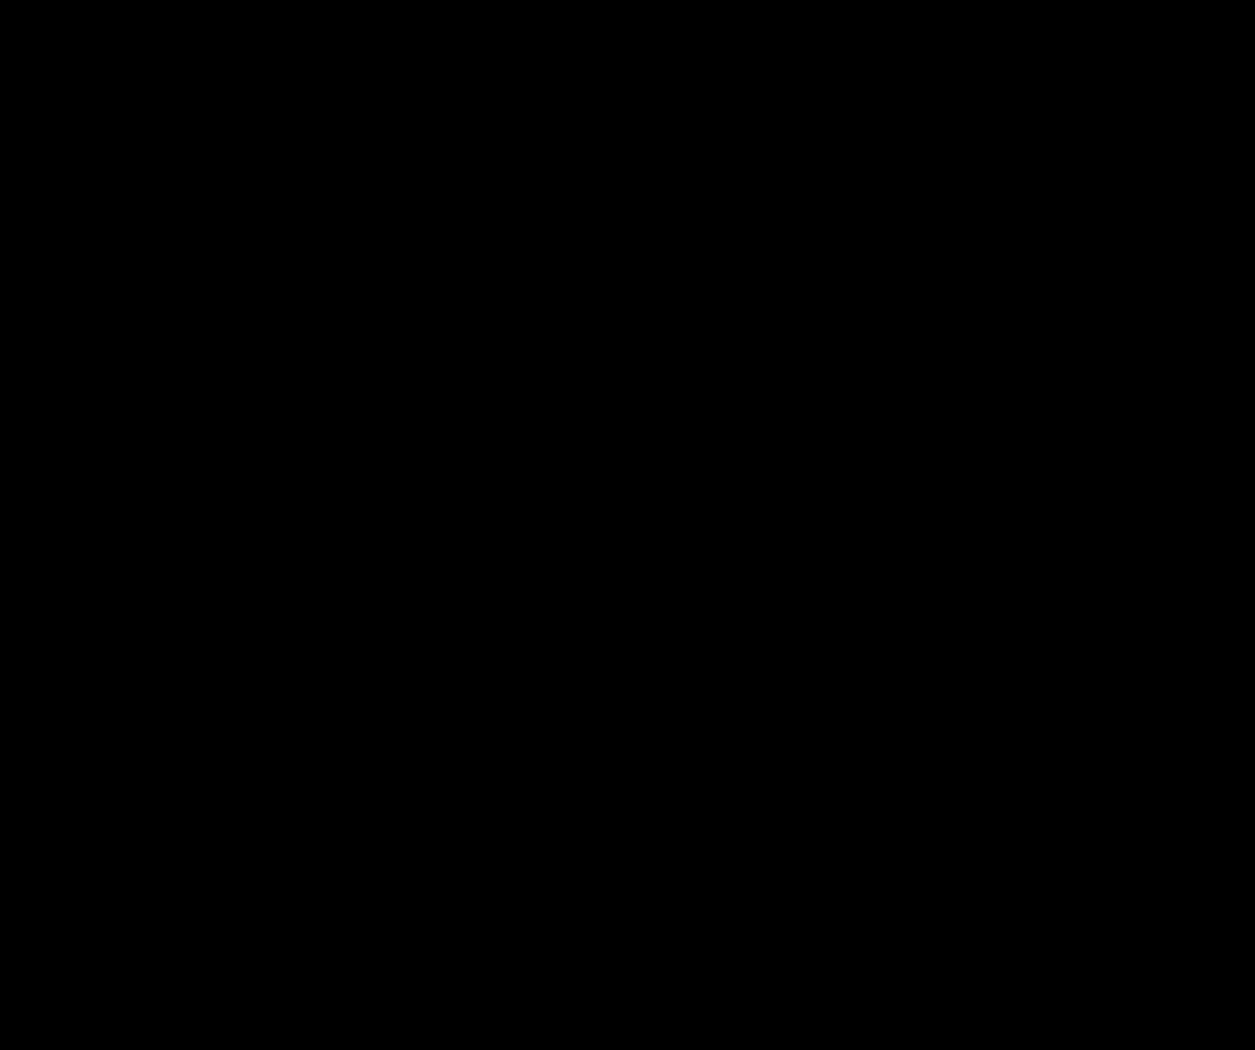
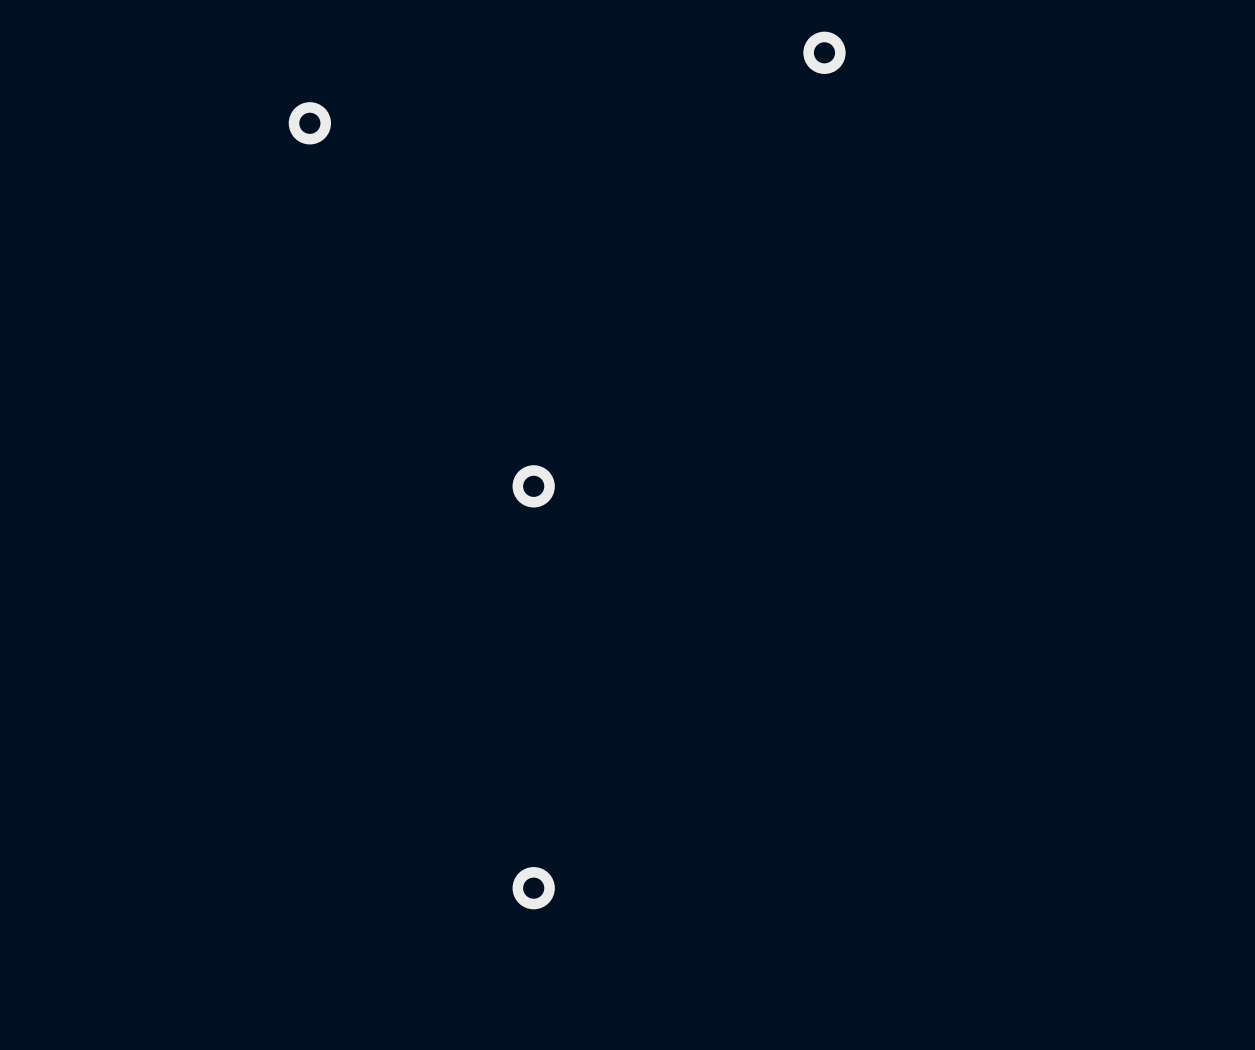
via: none -> (824, 52)
via: none -> (309, 123)
via: none -> (533, 486)
via: none -> (533, 888)

